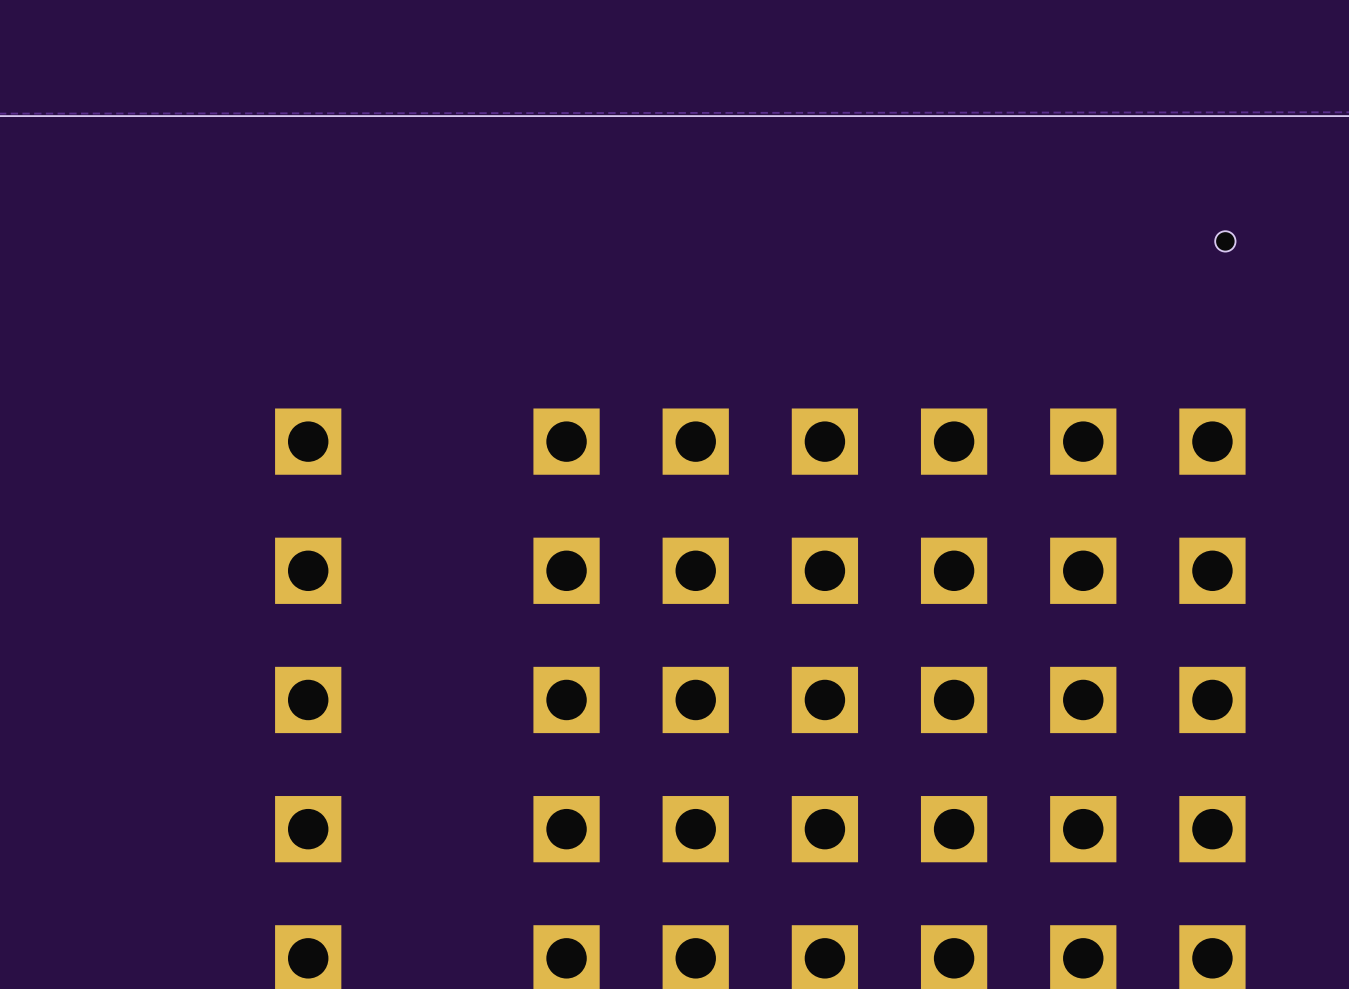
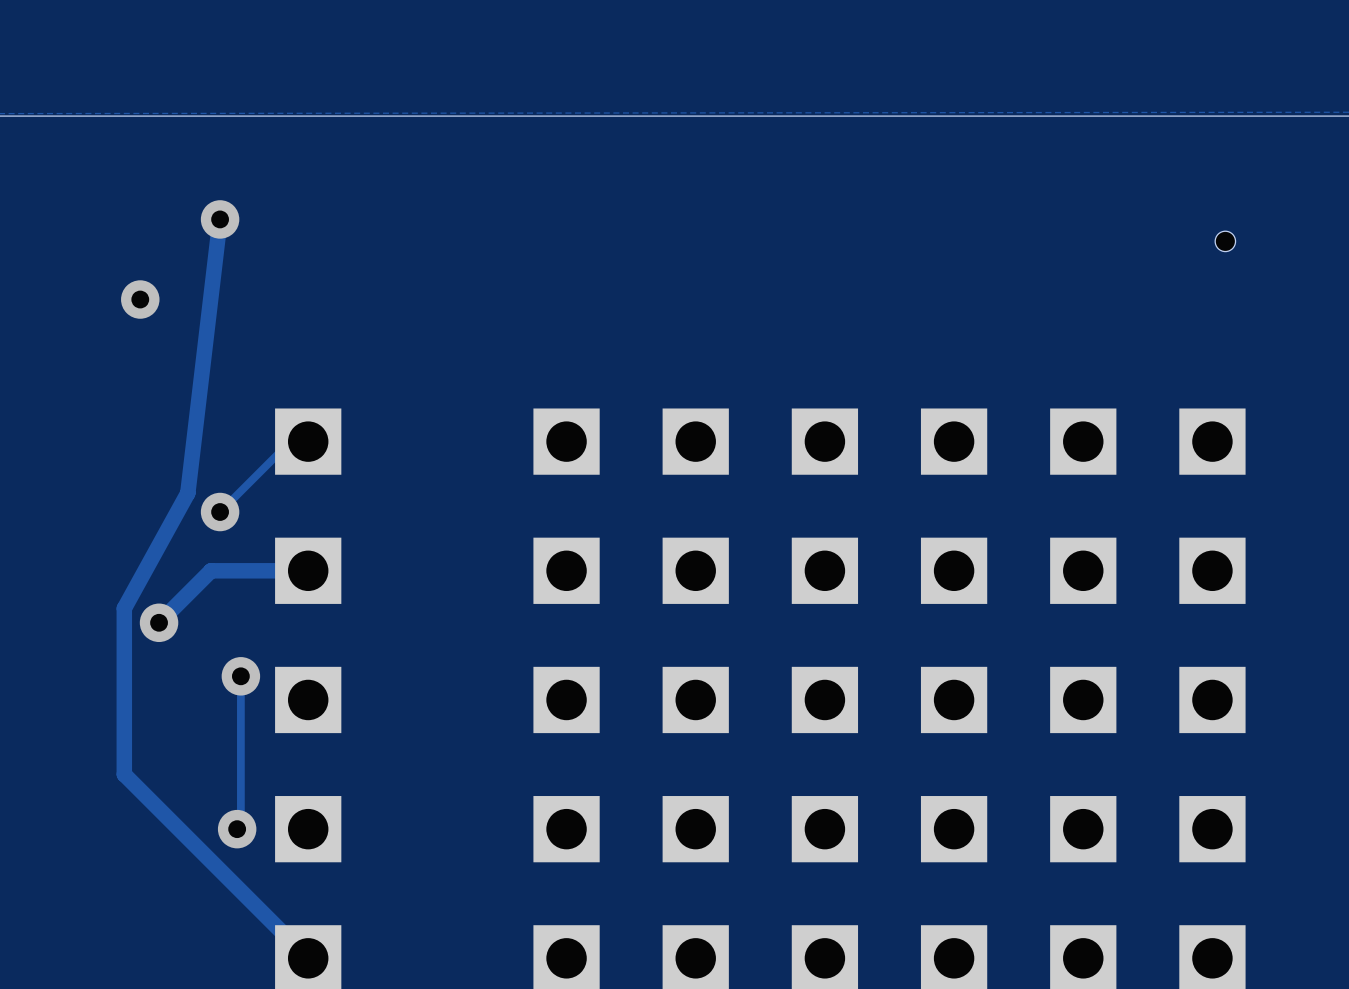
track: none -> (220, 219) (187, 493) (124, 608) (124, 774) (308, 958)
via: none -> (220, 219)
via: none -> (140, 299)
track: none -> (308, 441) (290, 441) (220, 512)
via: none -> (220, 512)
track: none -> (308, 570) (211, 570) (159, 622)
via: none -> (159, 622)
track: none -> (240, 676) (240, 825) (237, 829)
via: none -> (240, 676)
via: none -> (237, 829)

